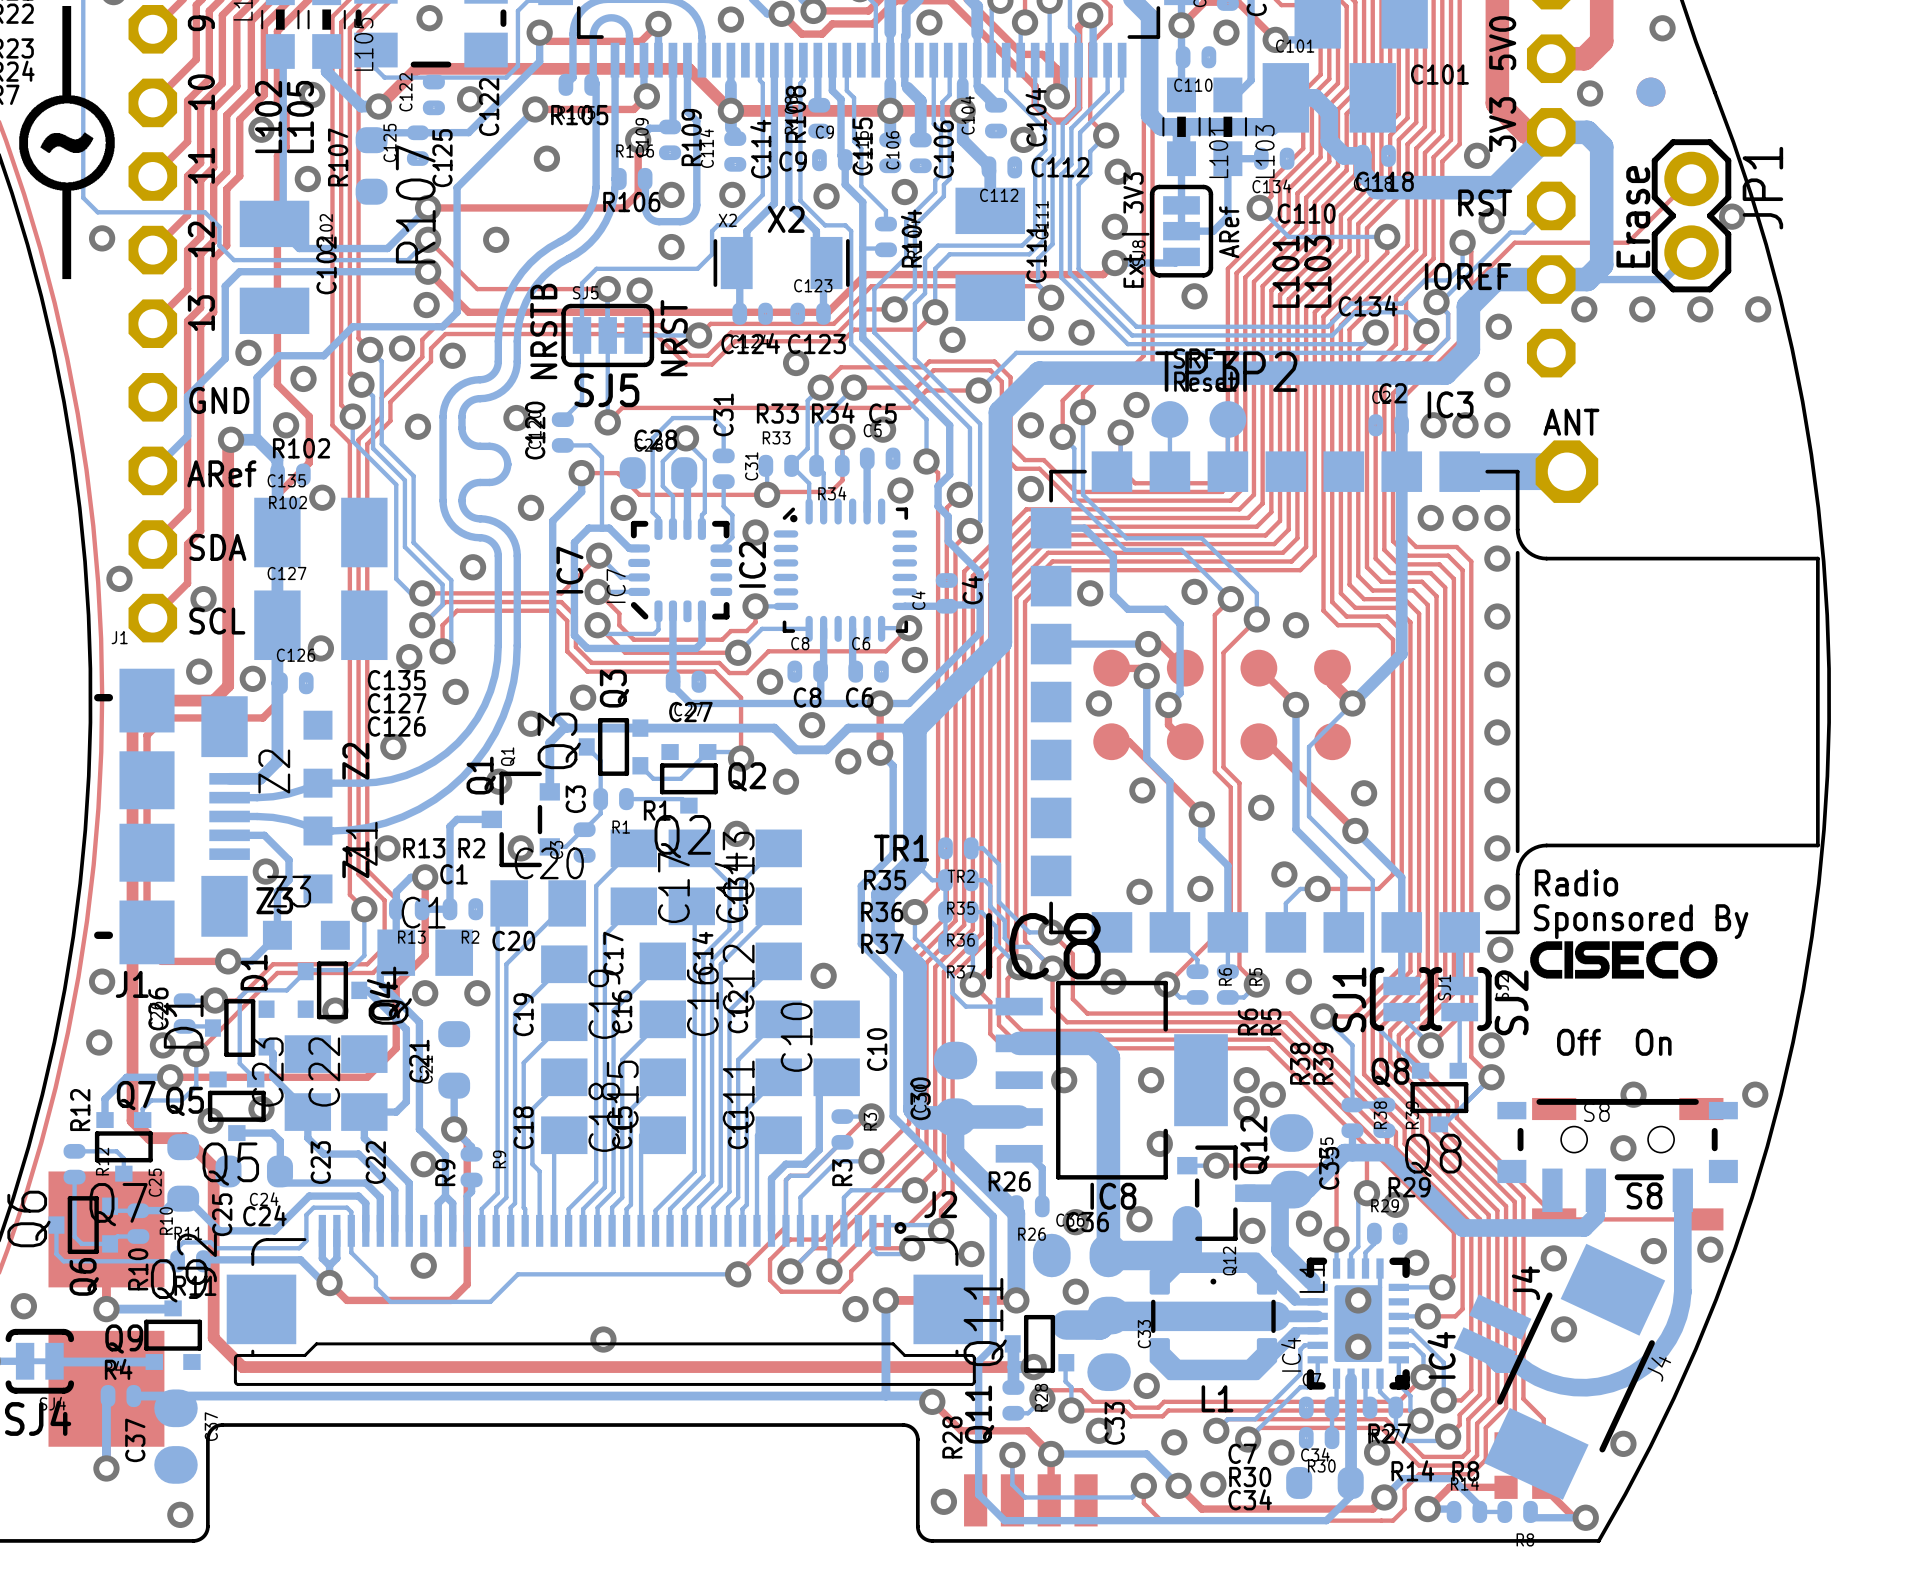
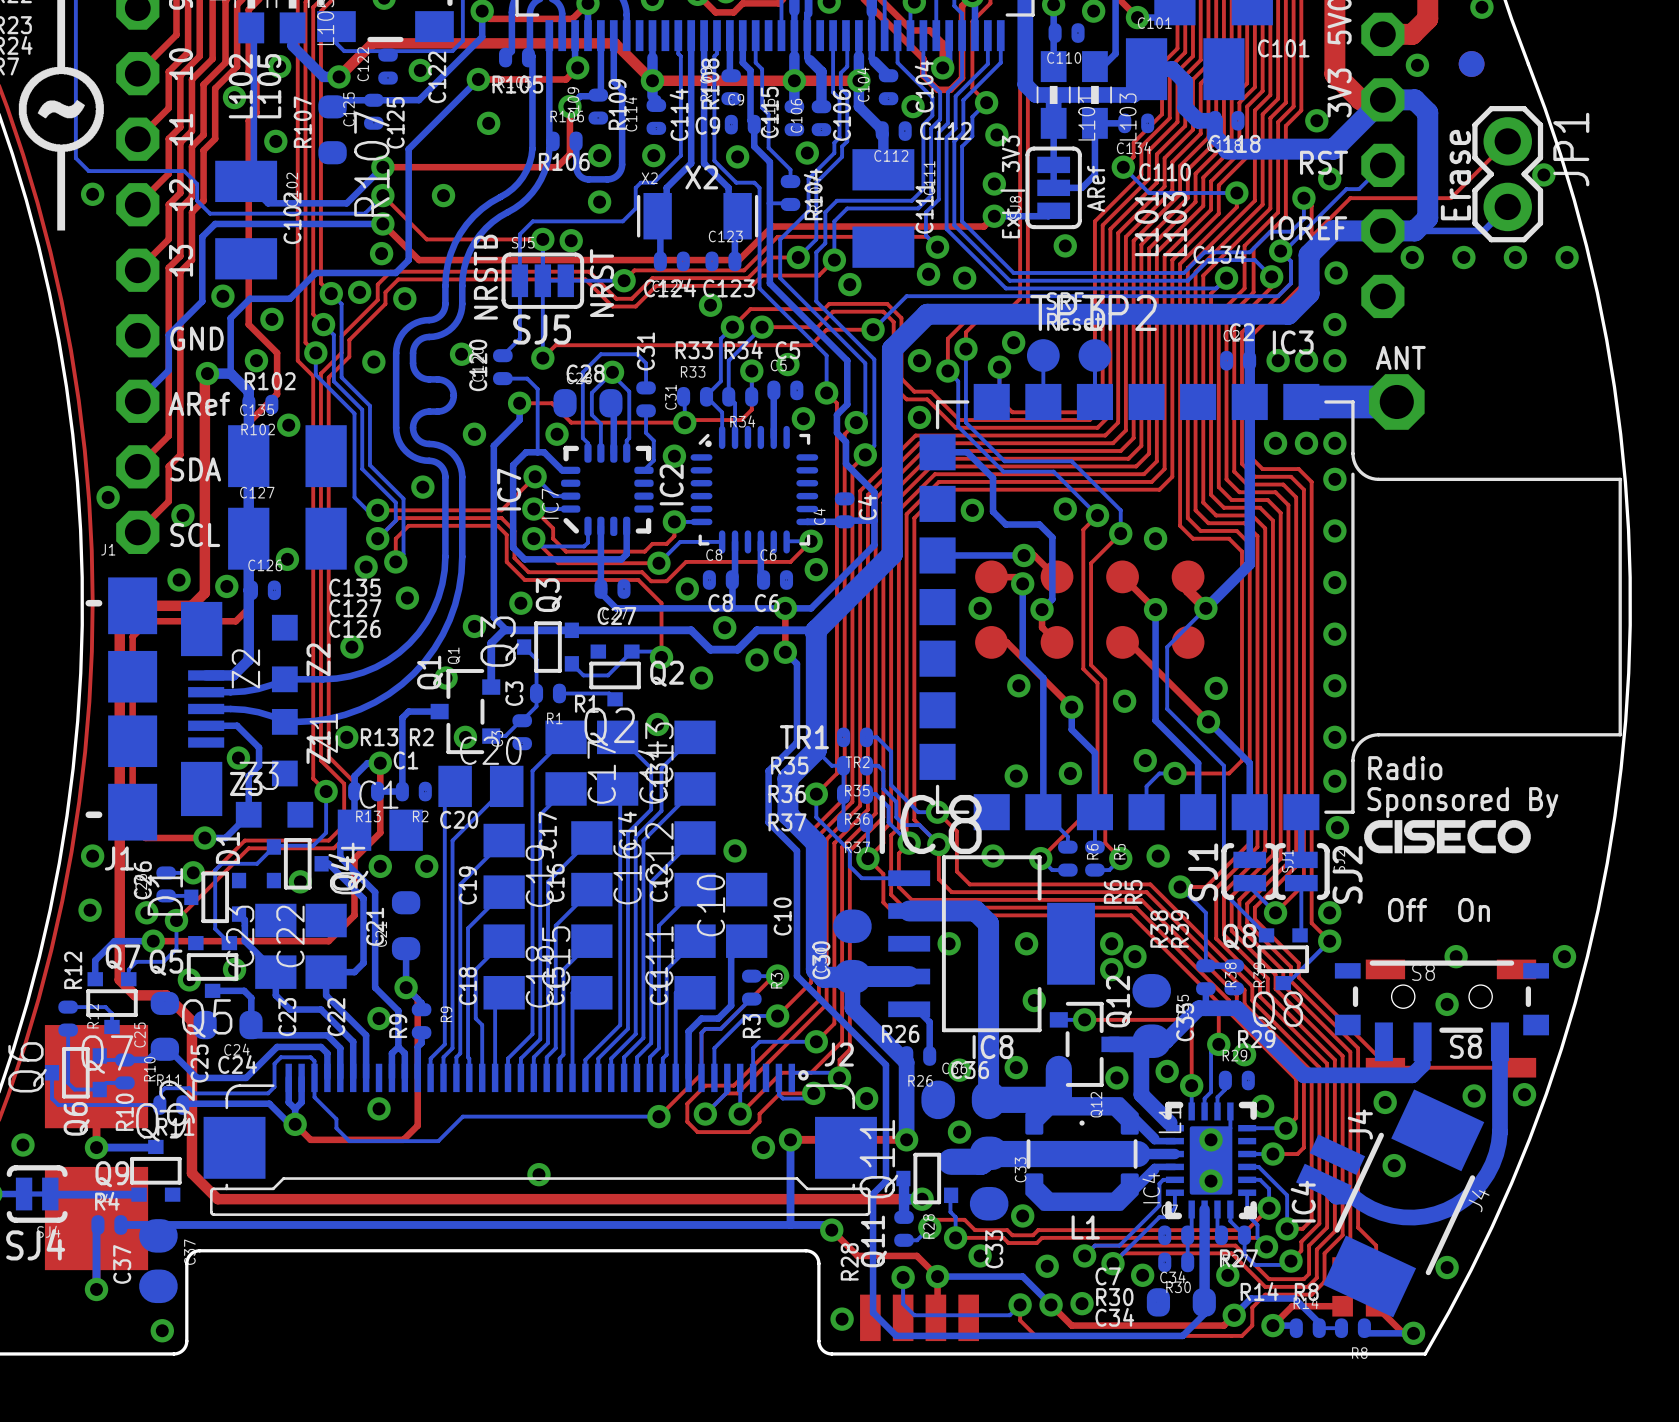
text position: IC4 (1441, 1355) -> IC4 (1303, 1201)

